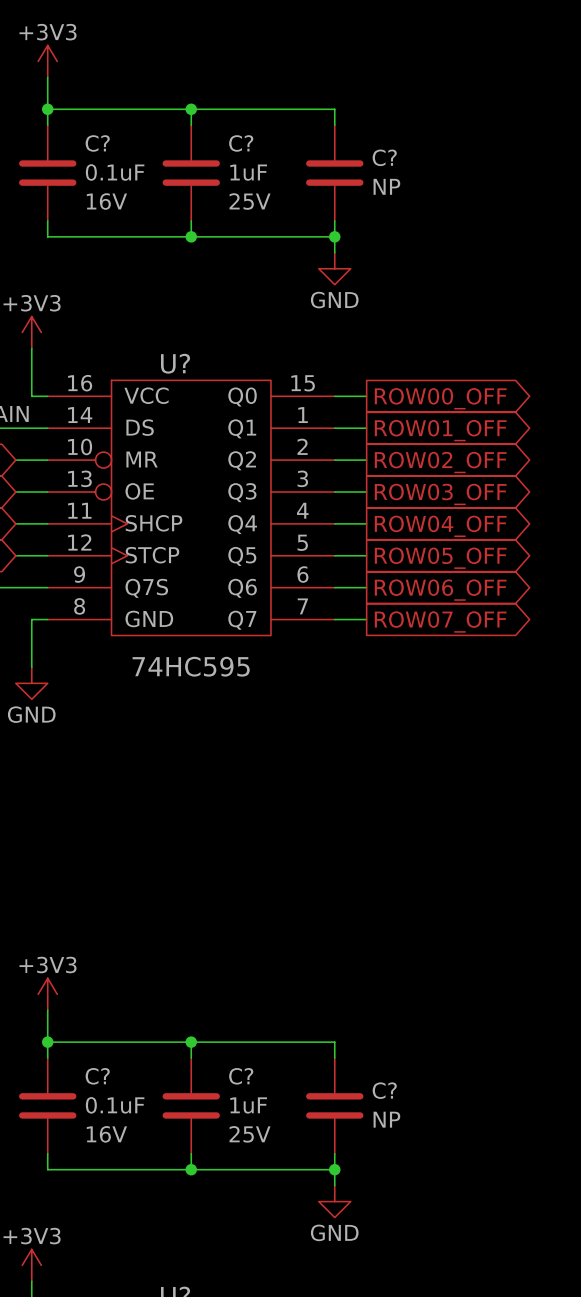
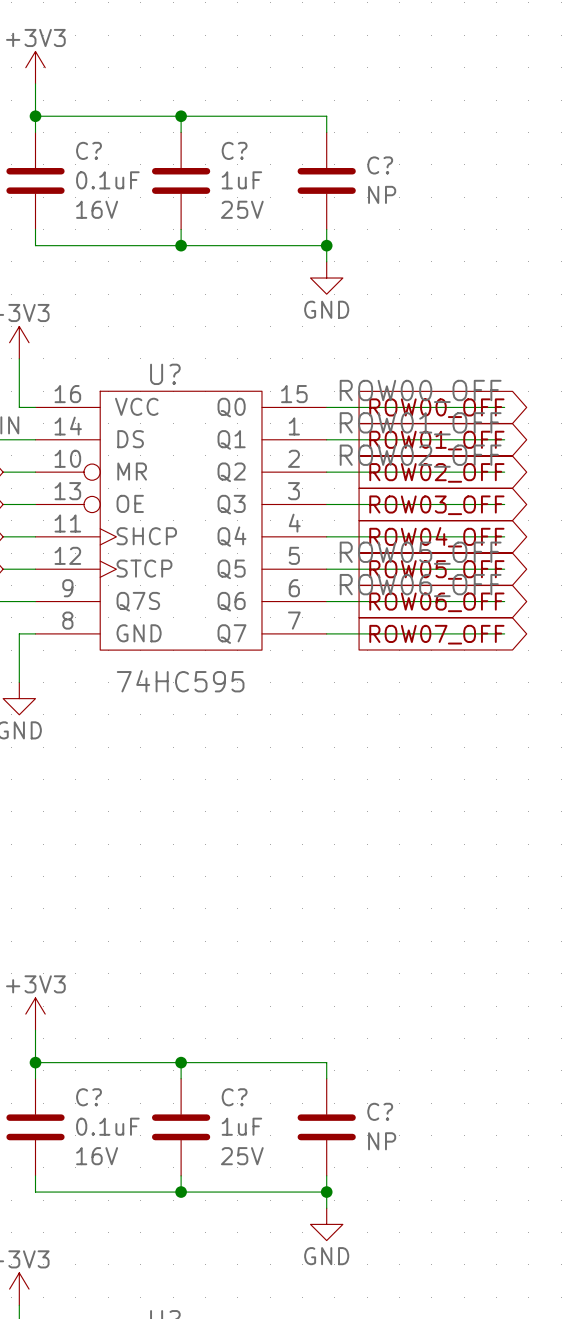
label: none -> ROW00_OFF (420, 391)
wire: none -> (359, 407) (504, 407)
label: none -> ROW01_OFF (420, 423)
wire: none -> (359, 439) (504, 439)
label: none -> ROW02_OFF (420, 456)
wire: none -> (359, 472) (504, 472)
wire: none -> (359, 504) (504, 504)
wire: none -> (359, 536) (504, 536)
label: none -> ROW05_OFF (420, 553)
wire: none -> (359, 569) (504, 569)
label: none -> ROW06_OFF (420, 585)
wire: none -> (359, 601) (504, 601)
wire: none -> (359, 633) (504, 633)

